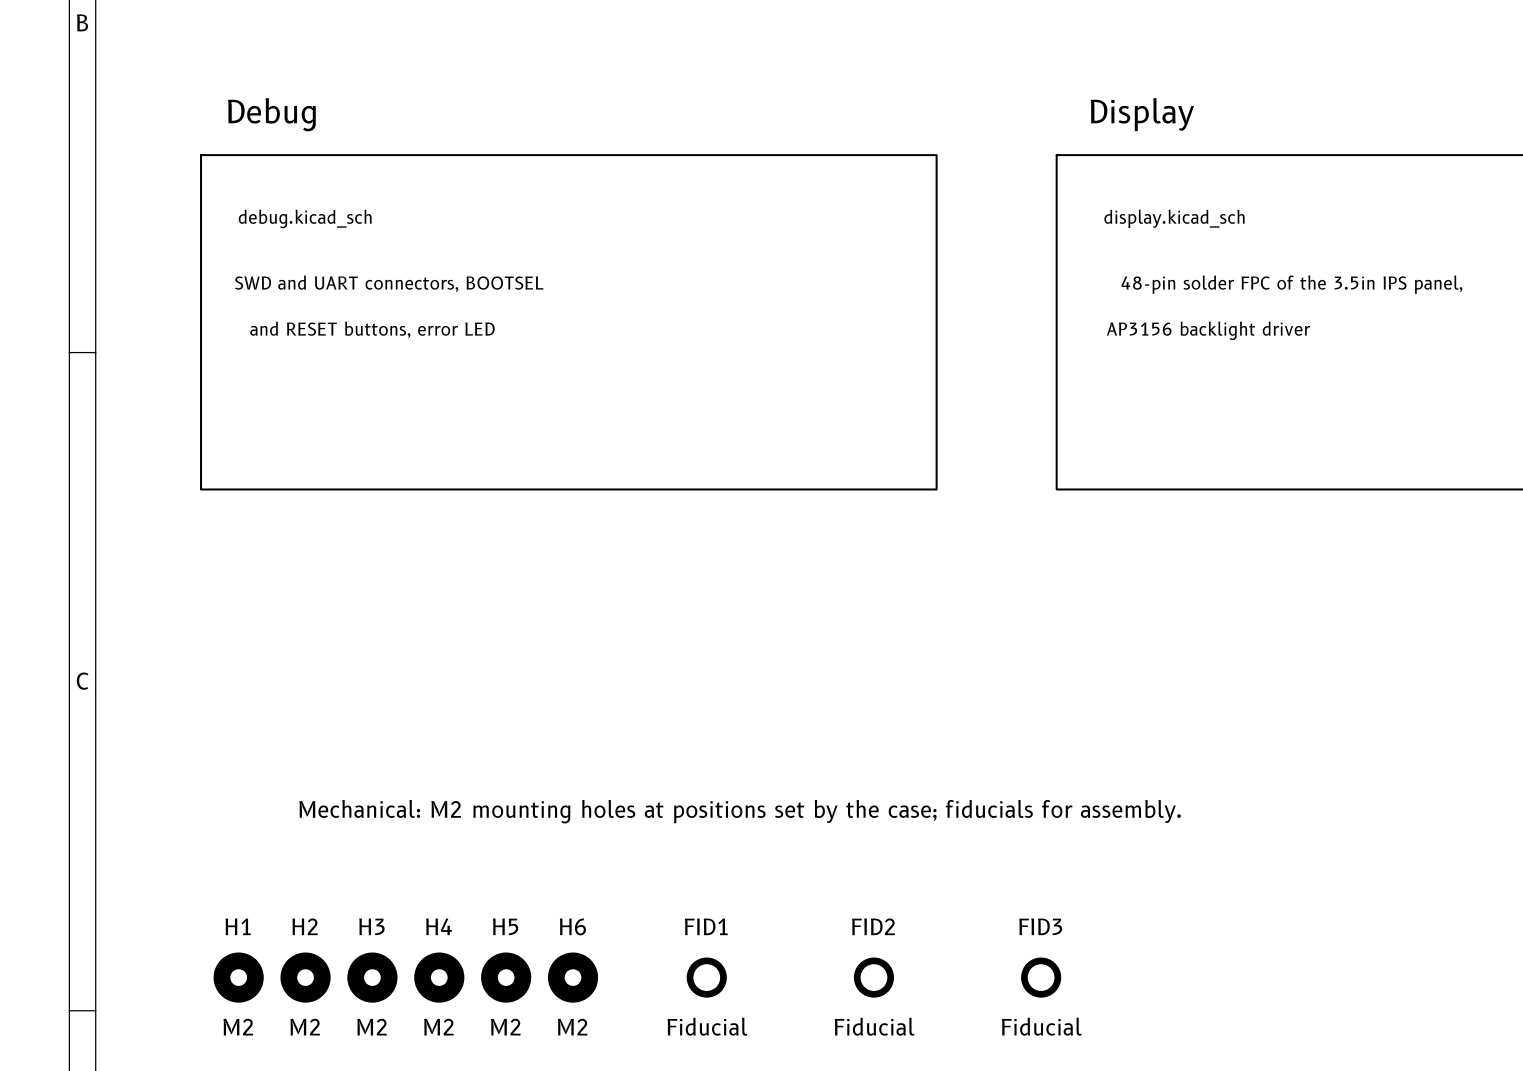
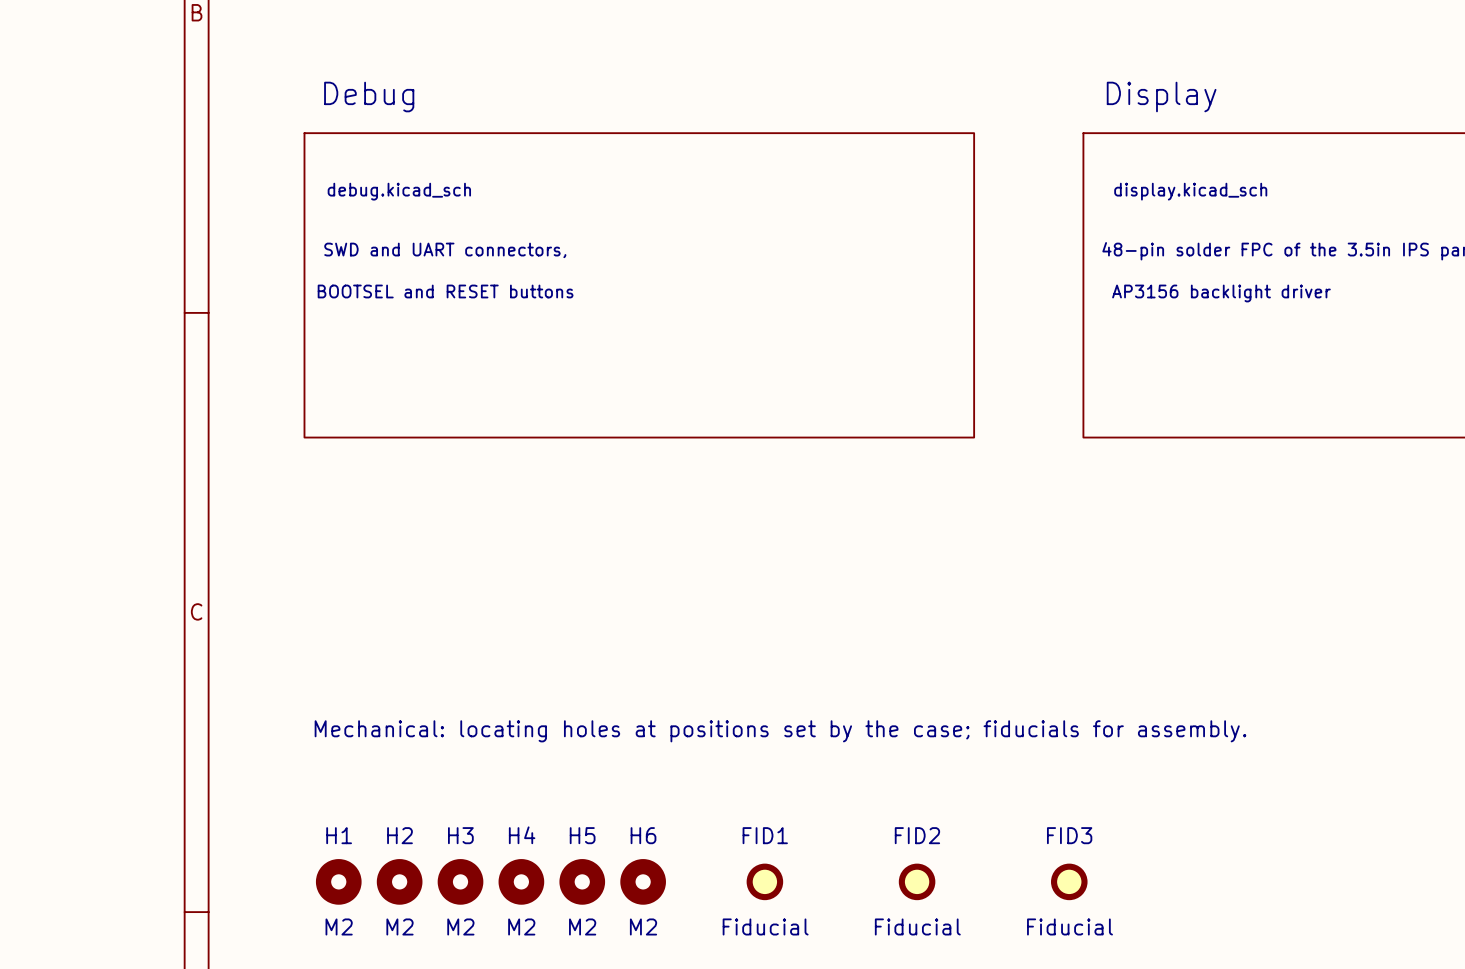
text: SWD and UART connectors, BOOTSEL (389, 283) -> SWD and UART connectors, (445, 250)
text: and RESET buttons, error LED (372, 329) -> BOOTSEL and RESET buttons (445, 291)
text: Mechanical: M2 mounting holes at positions set by the case; fiducials for assembly. (740, 811) -> Mechanical: locating holes at positions set by the case; fiducials for assembly. (780, 731)

